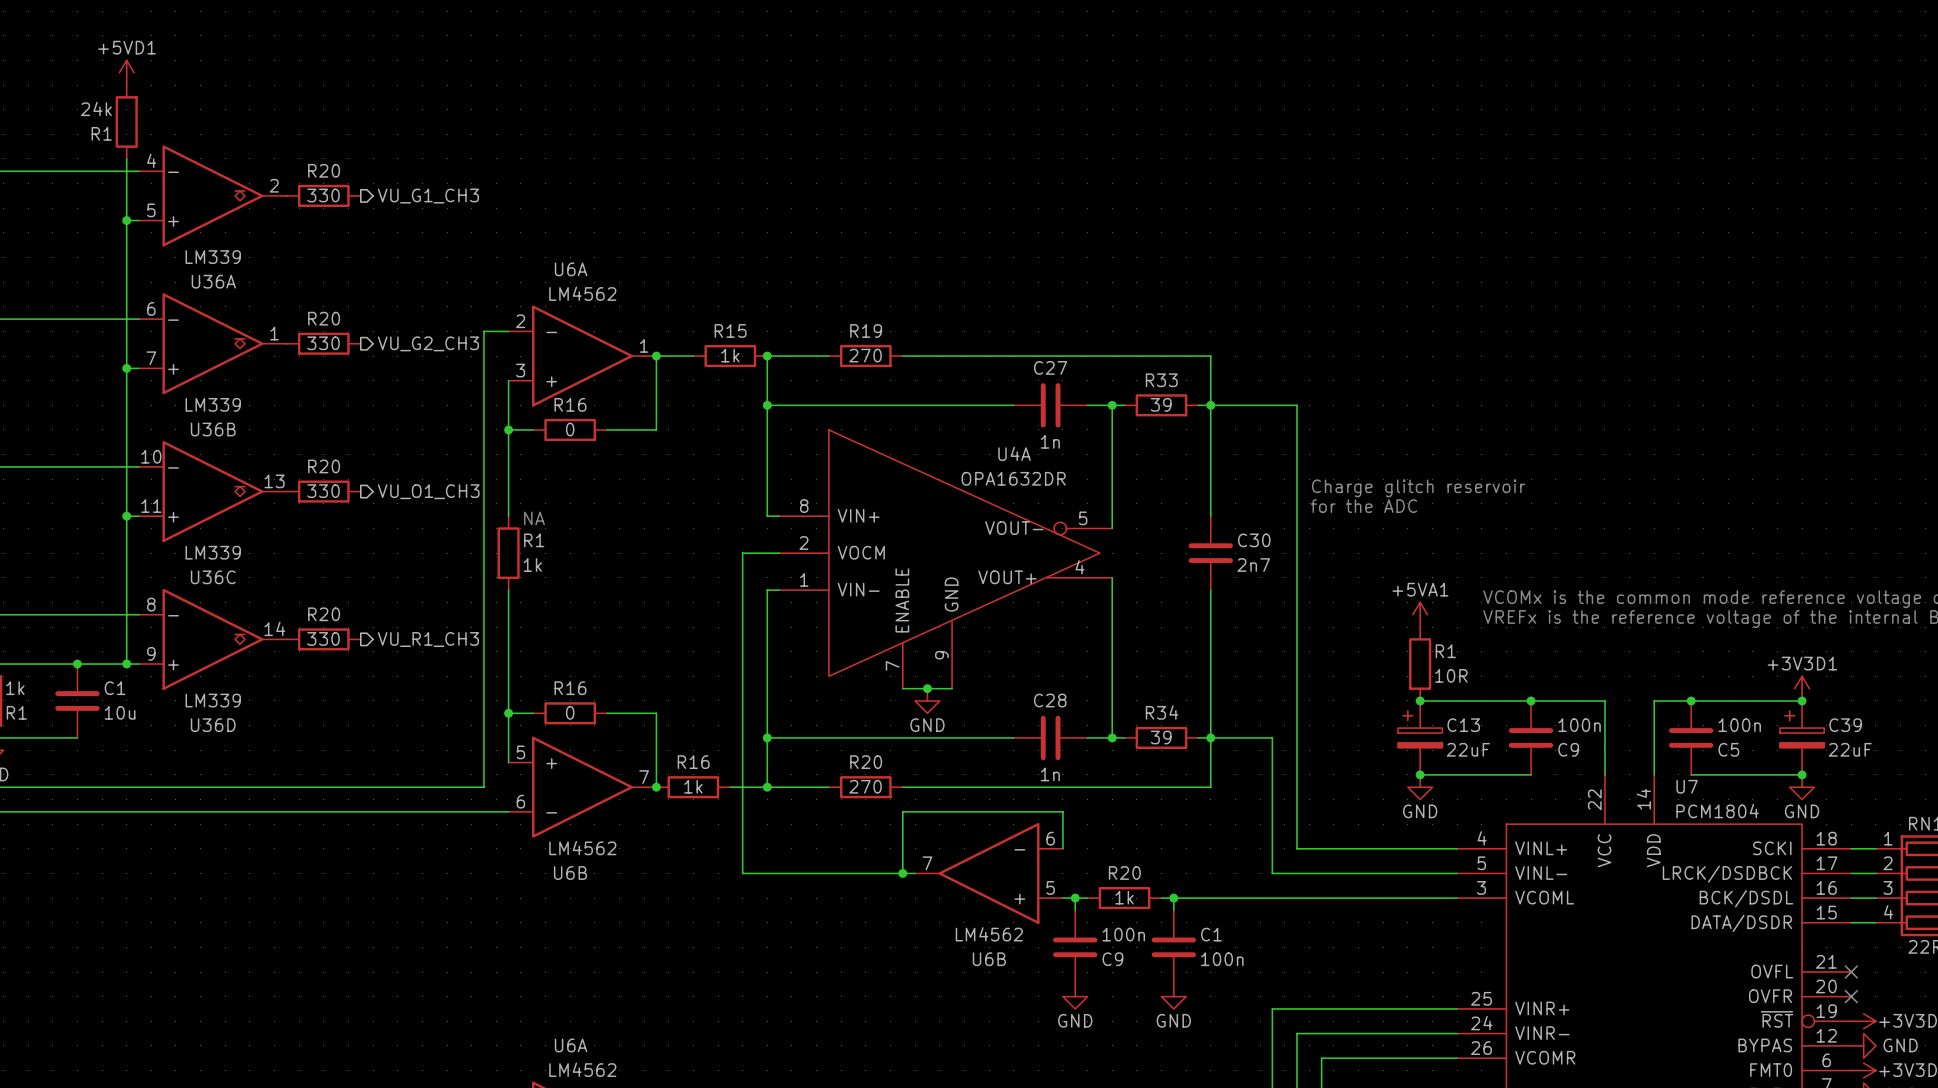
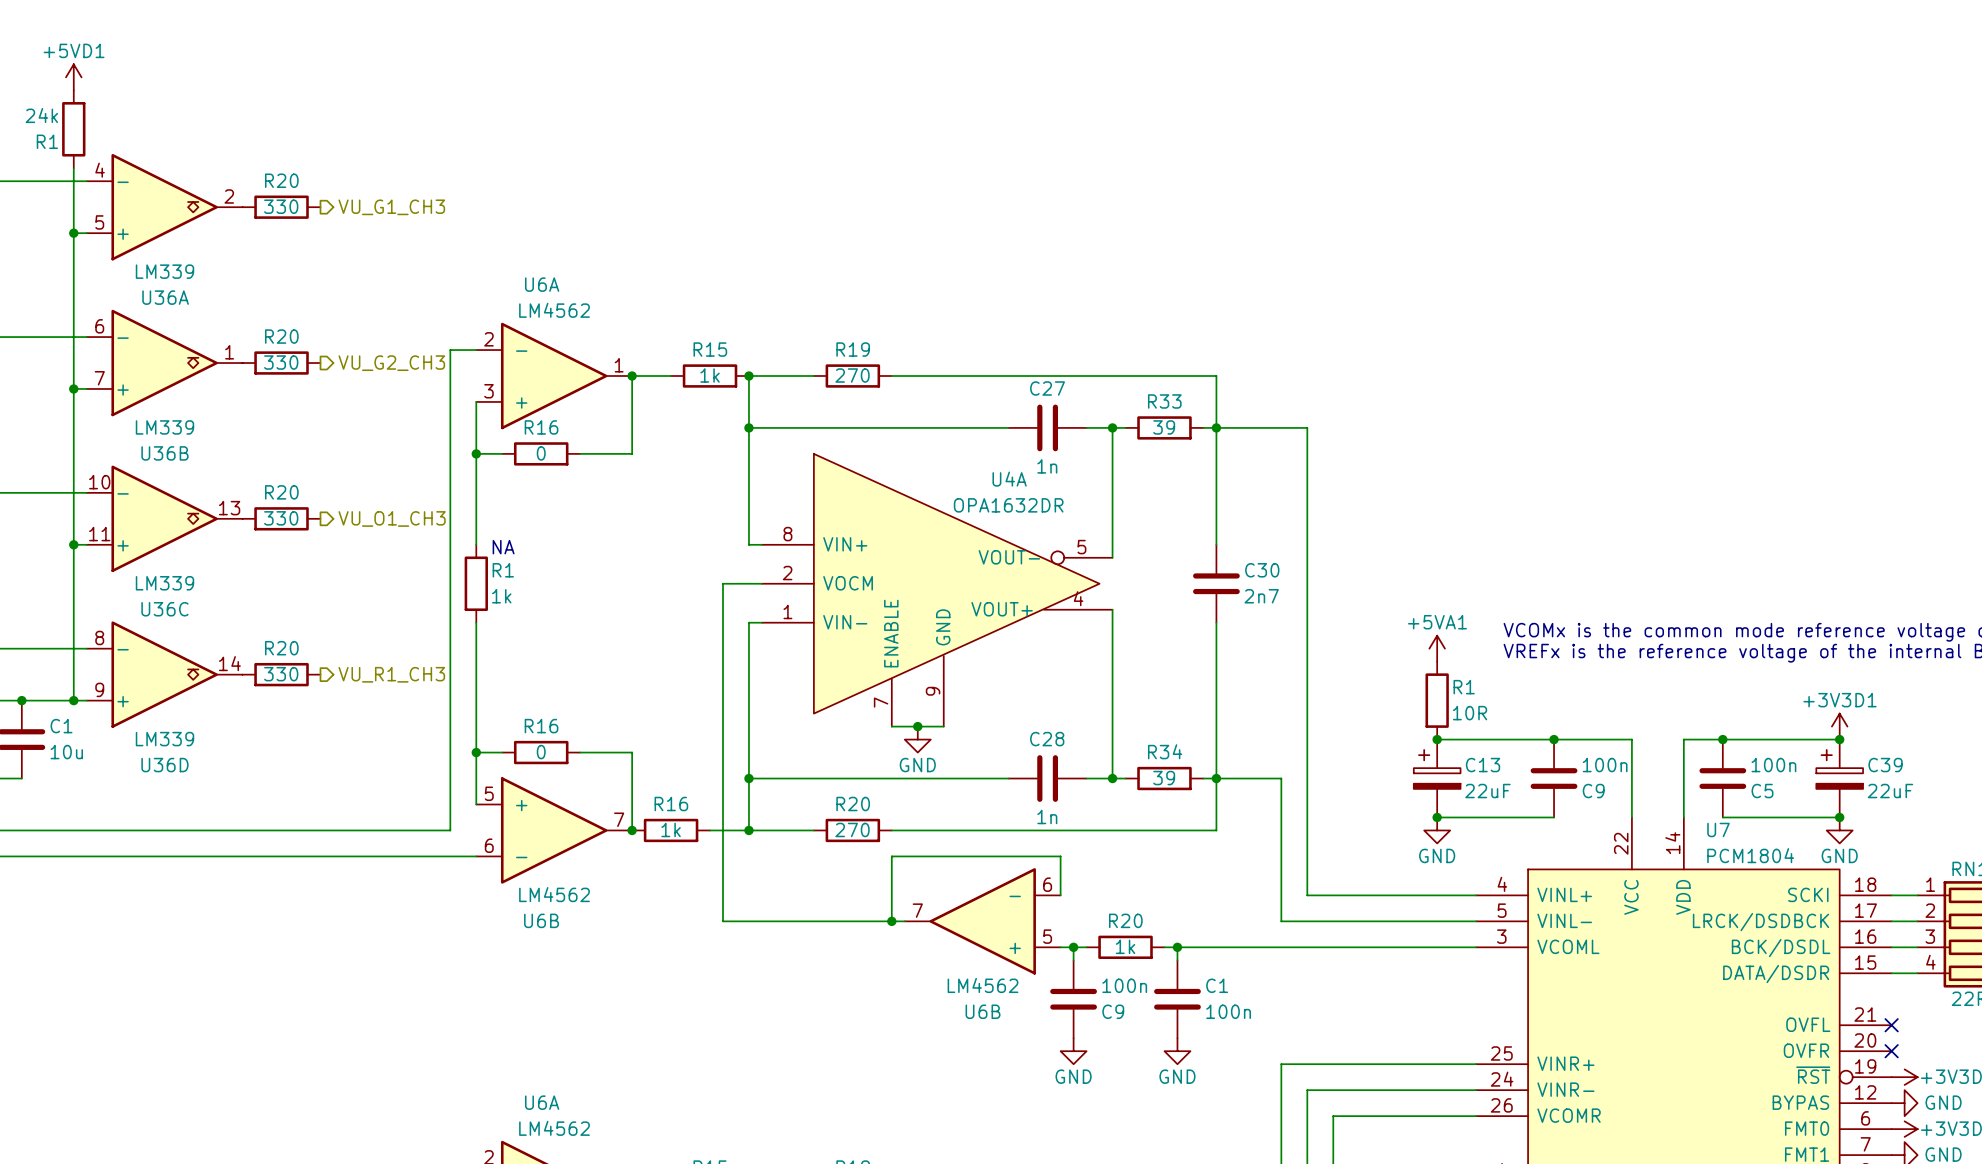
text: Charge glitch reservoir (1418, 488) -> none
text: for the ADC (1363, 506) -> none

